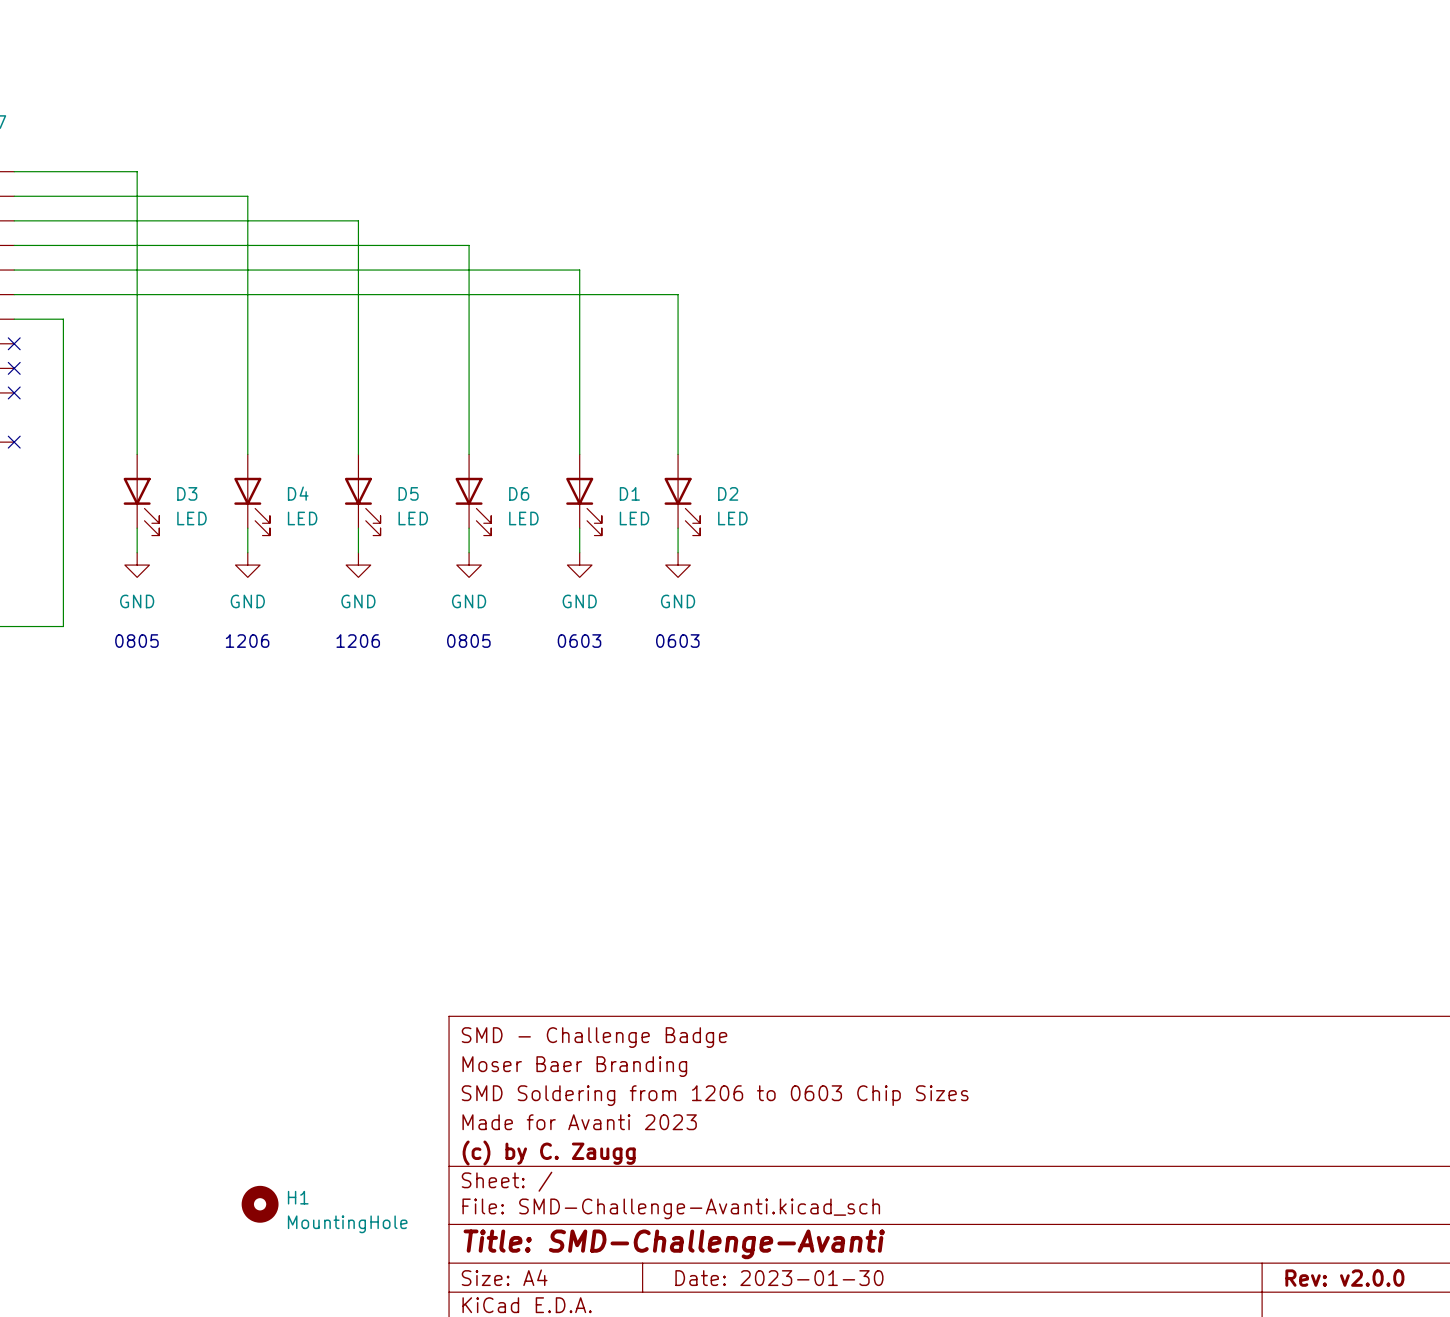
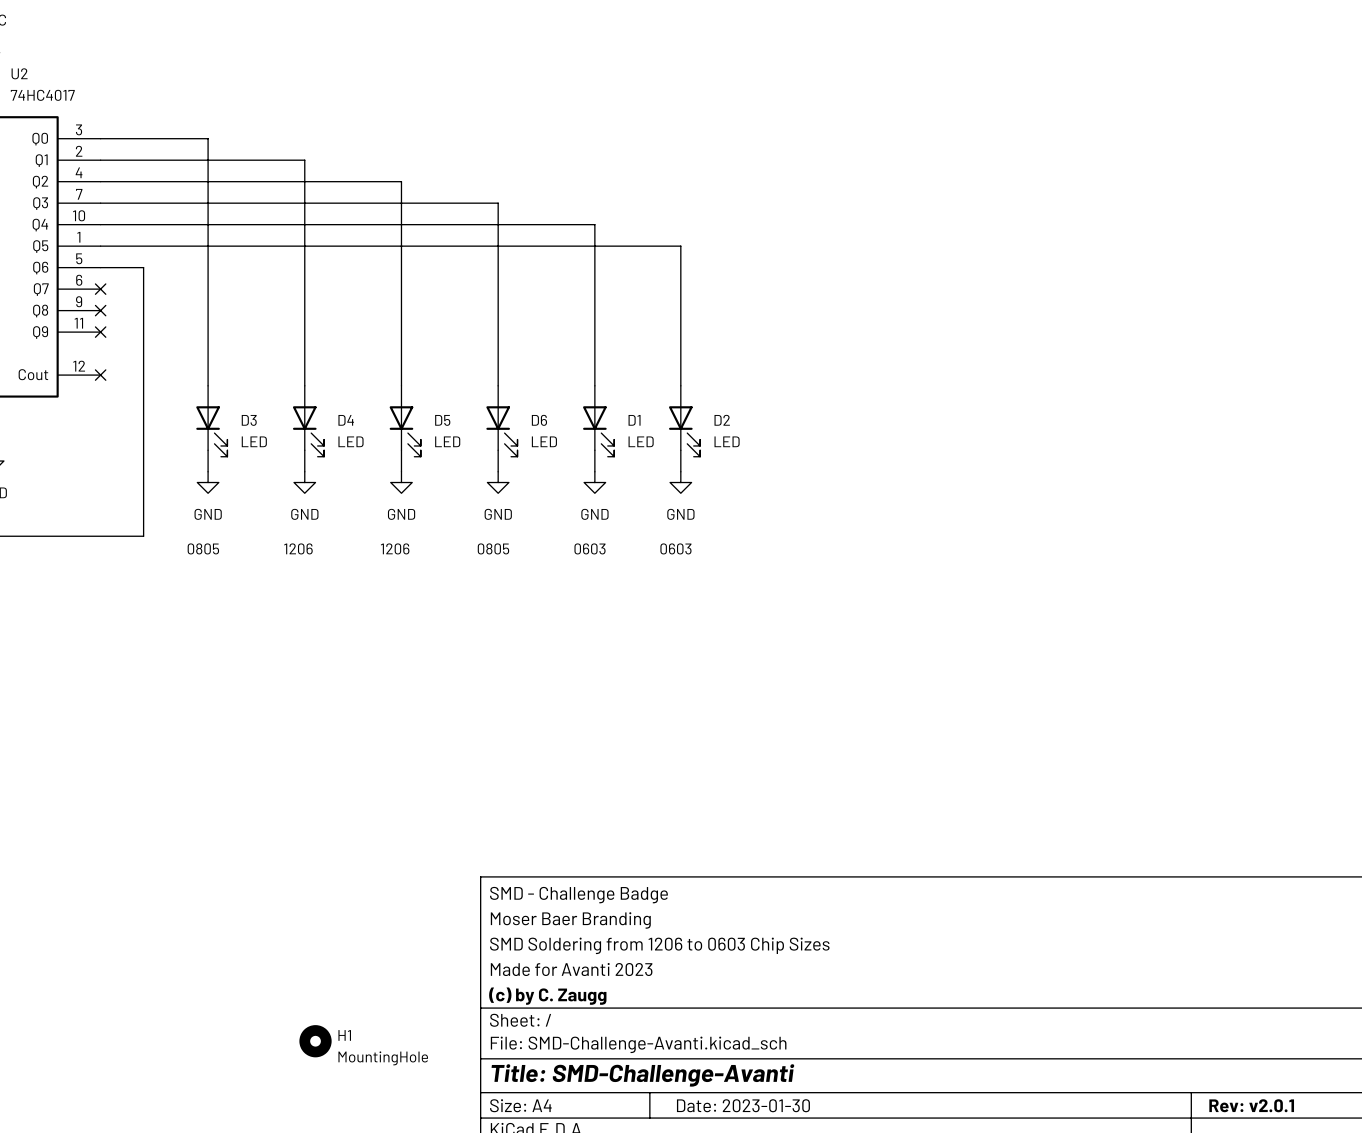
title block: Rev: v2.0.0 (1344, 1278) -> Rev: v2.0.1 (1251, 1105)

